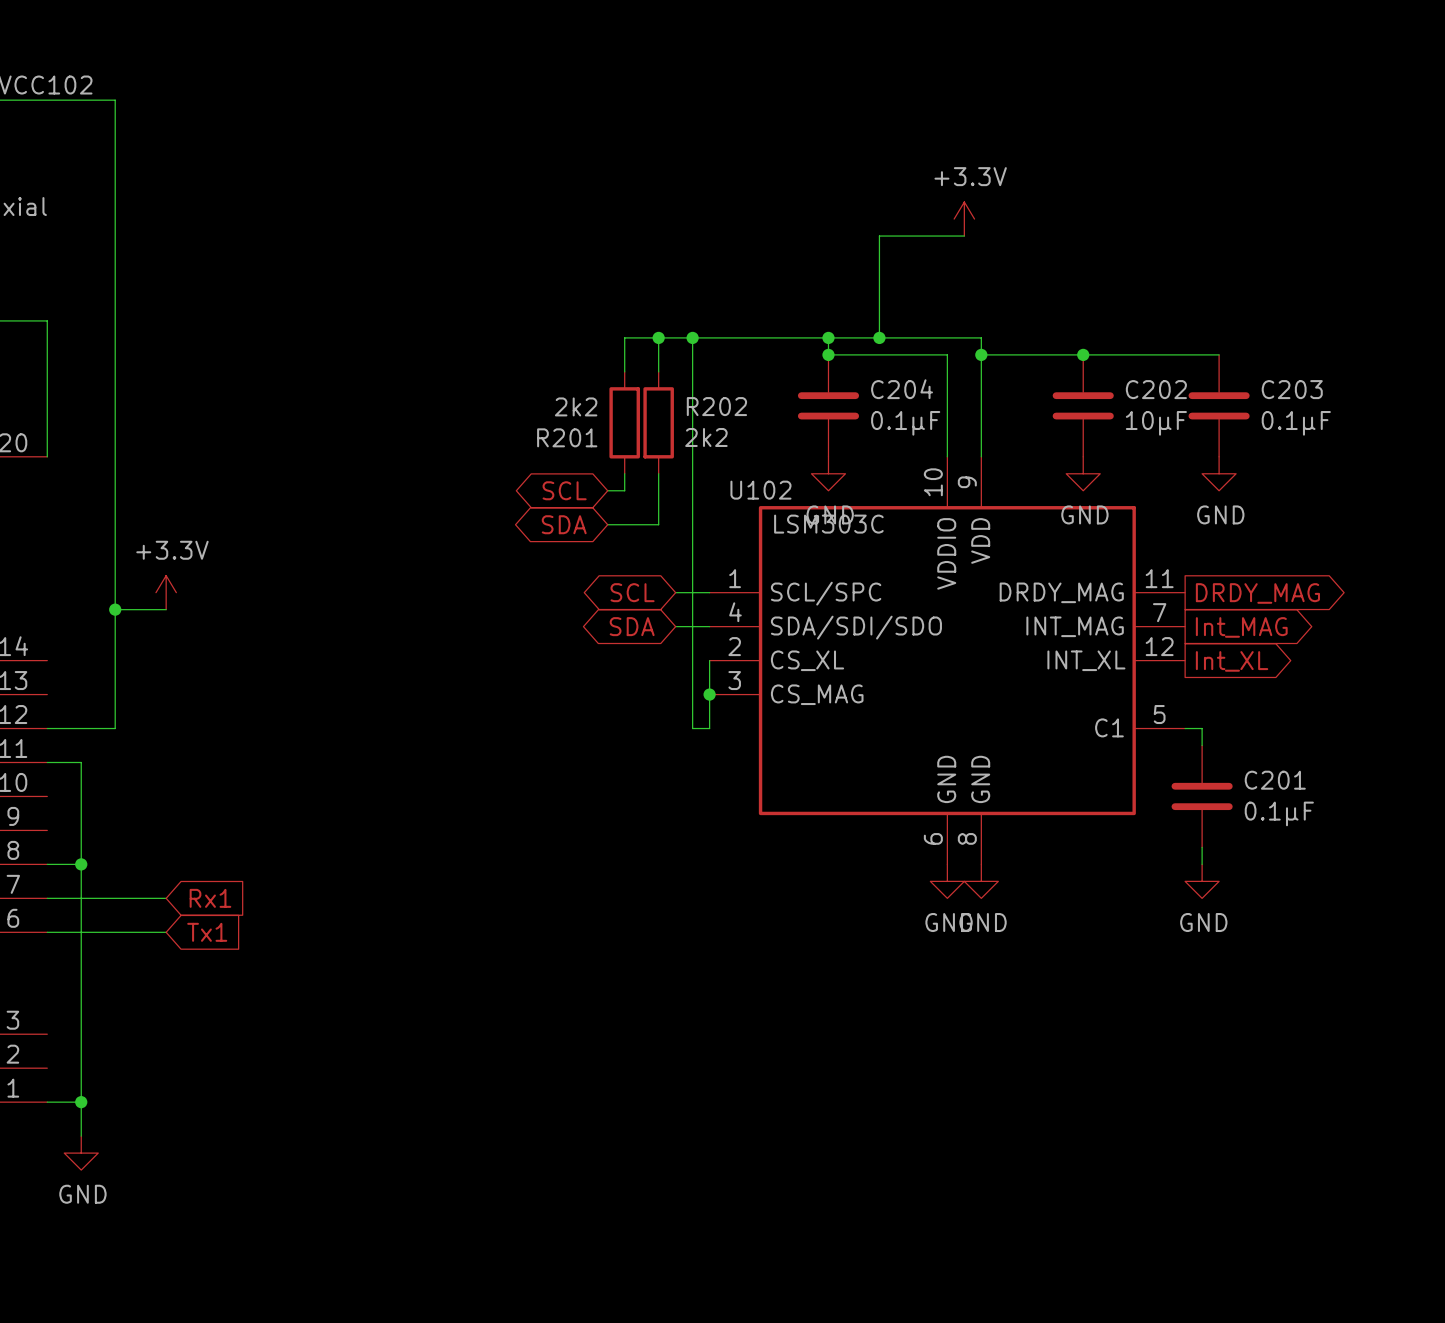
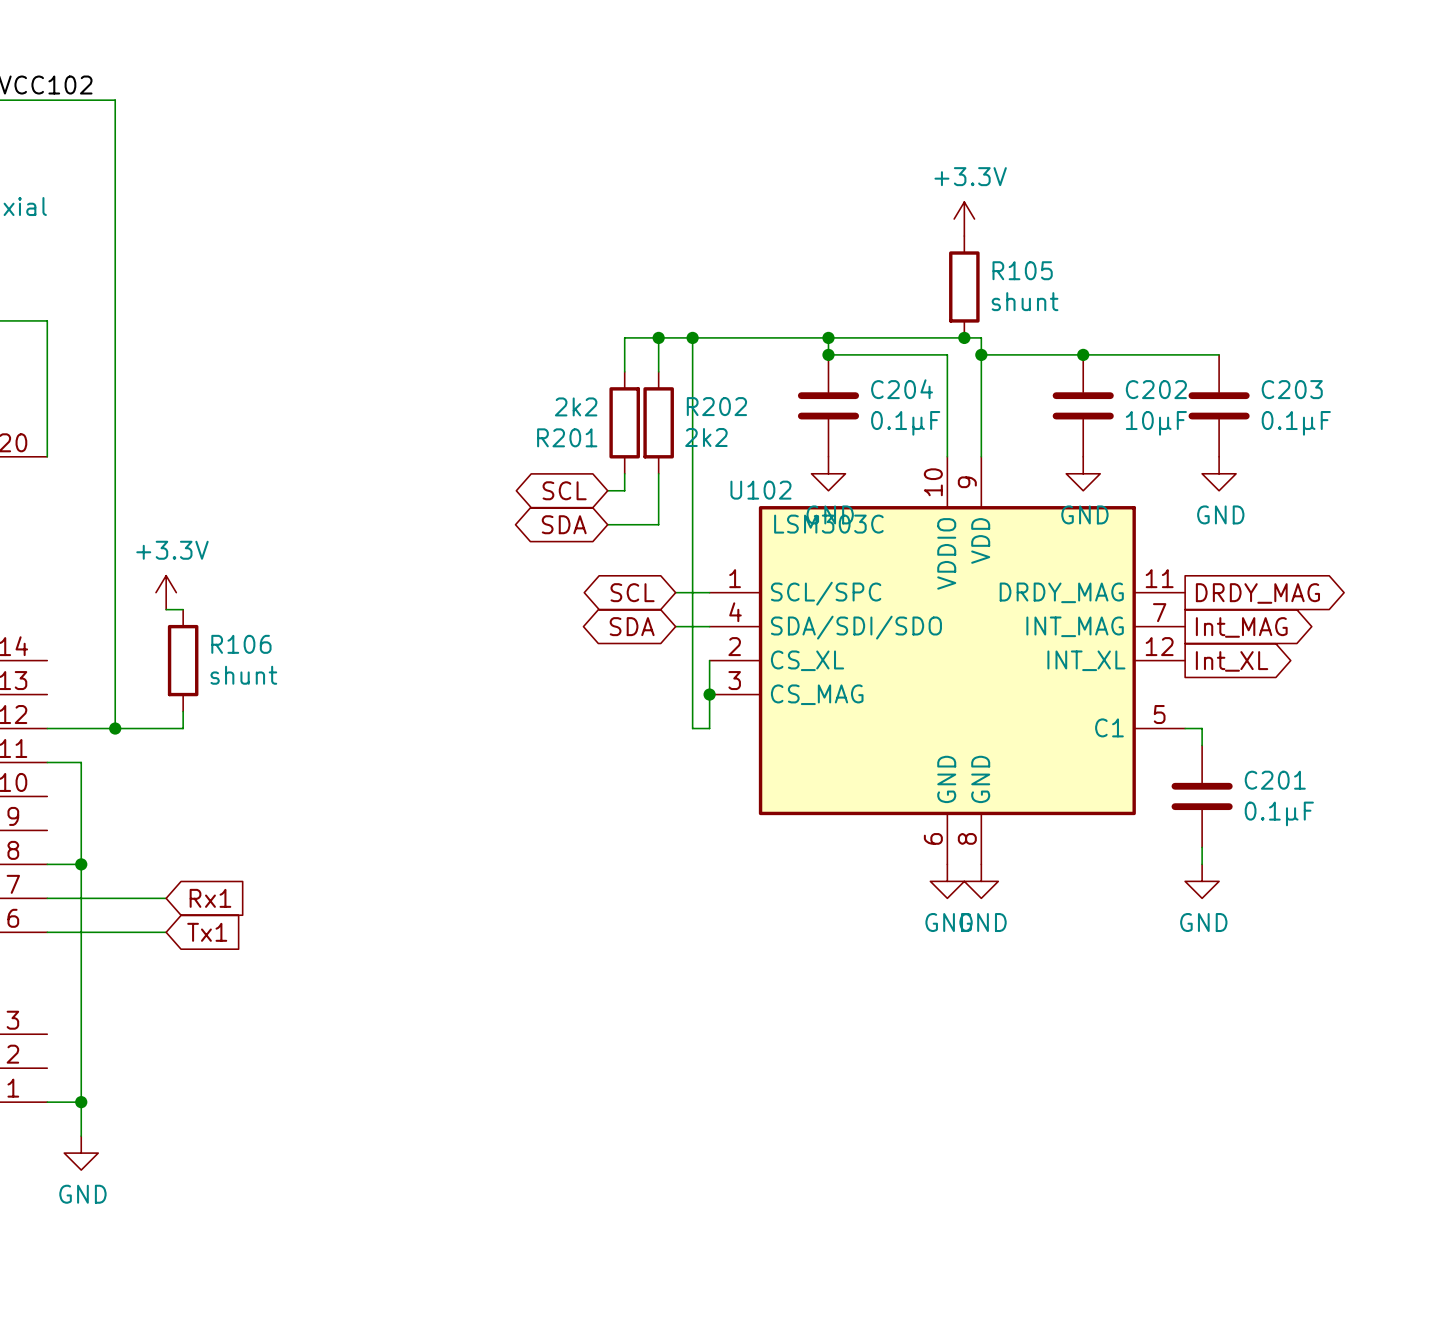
wire: (964, 236) (879, 236) (879, 337) -> none
R105: none -> shunt (964, 286)
junction: (879, 337) -> none
junction: none -> (964, 337)
wire: (115, 609) (166, 609) -> (183, 609) (166, 609)
junction: (115, 609) -> none
R106: none -> shunt (183, 660)
wire: none -> (183, 711) (183, 728) (115, 728)
junction: none -> (115, 728)

